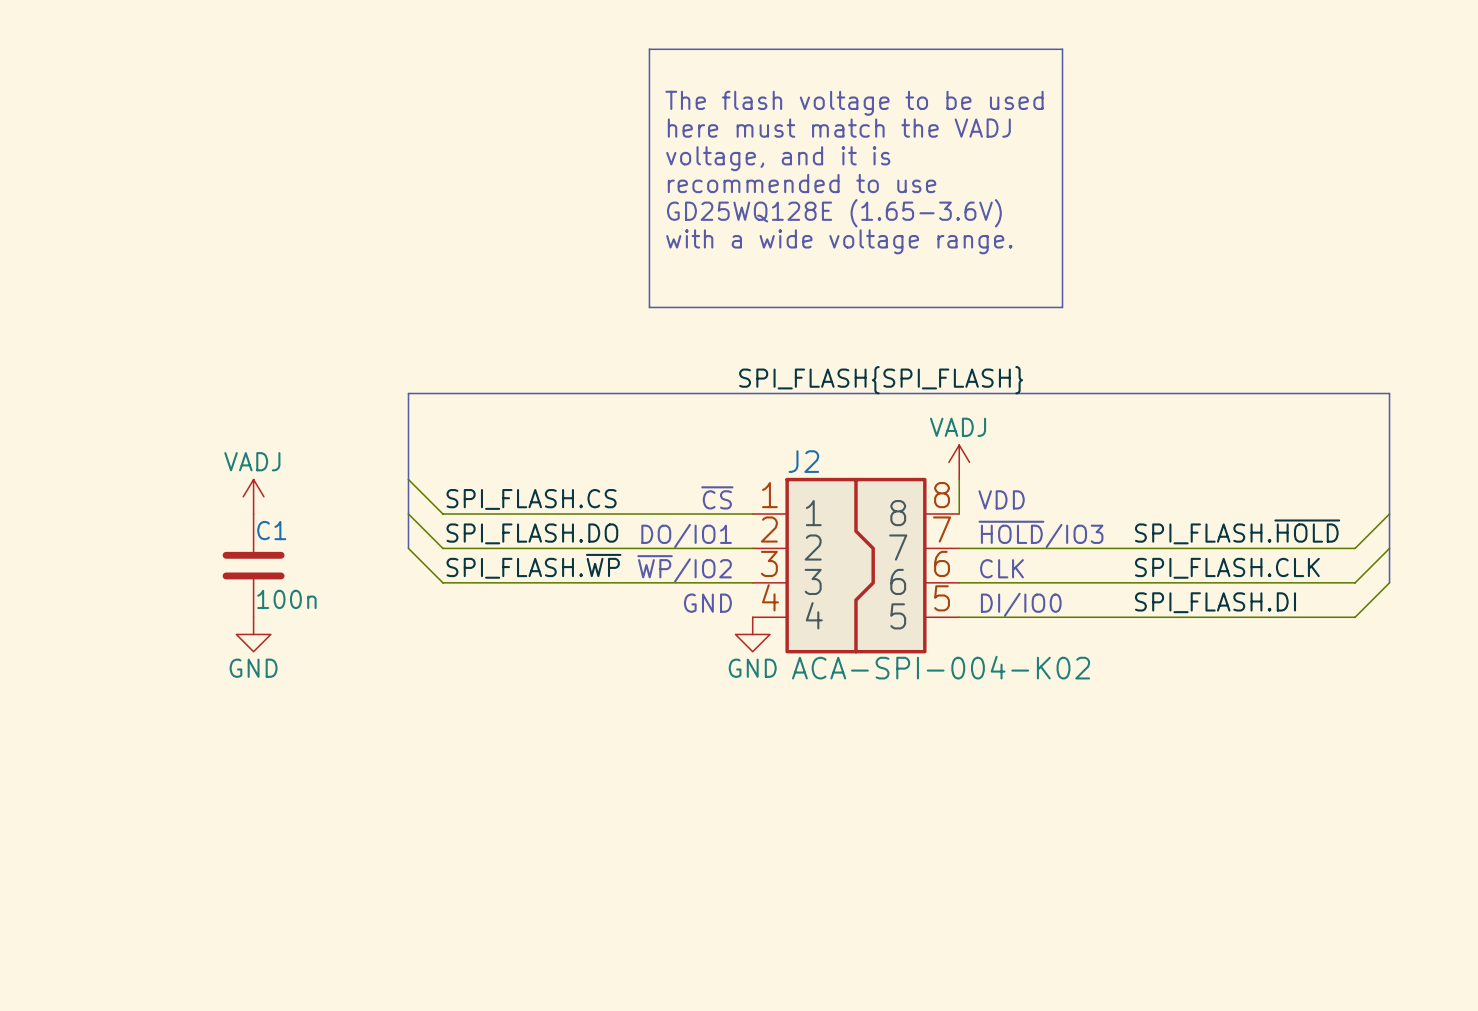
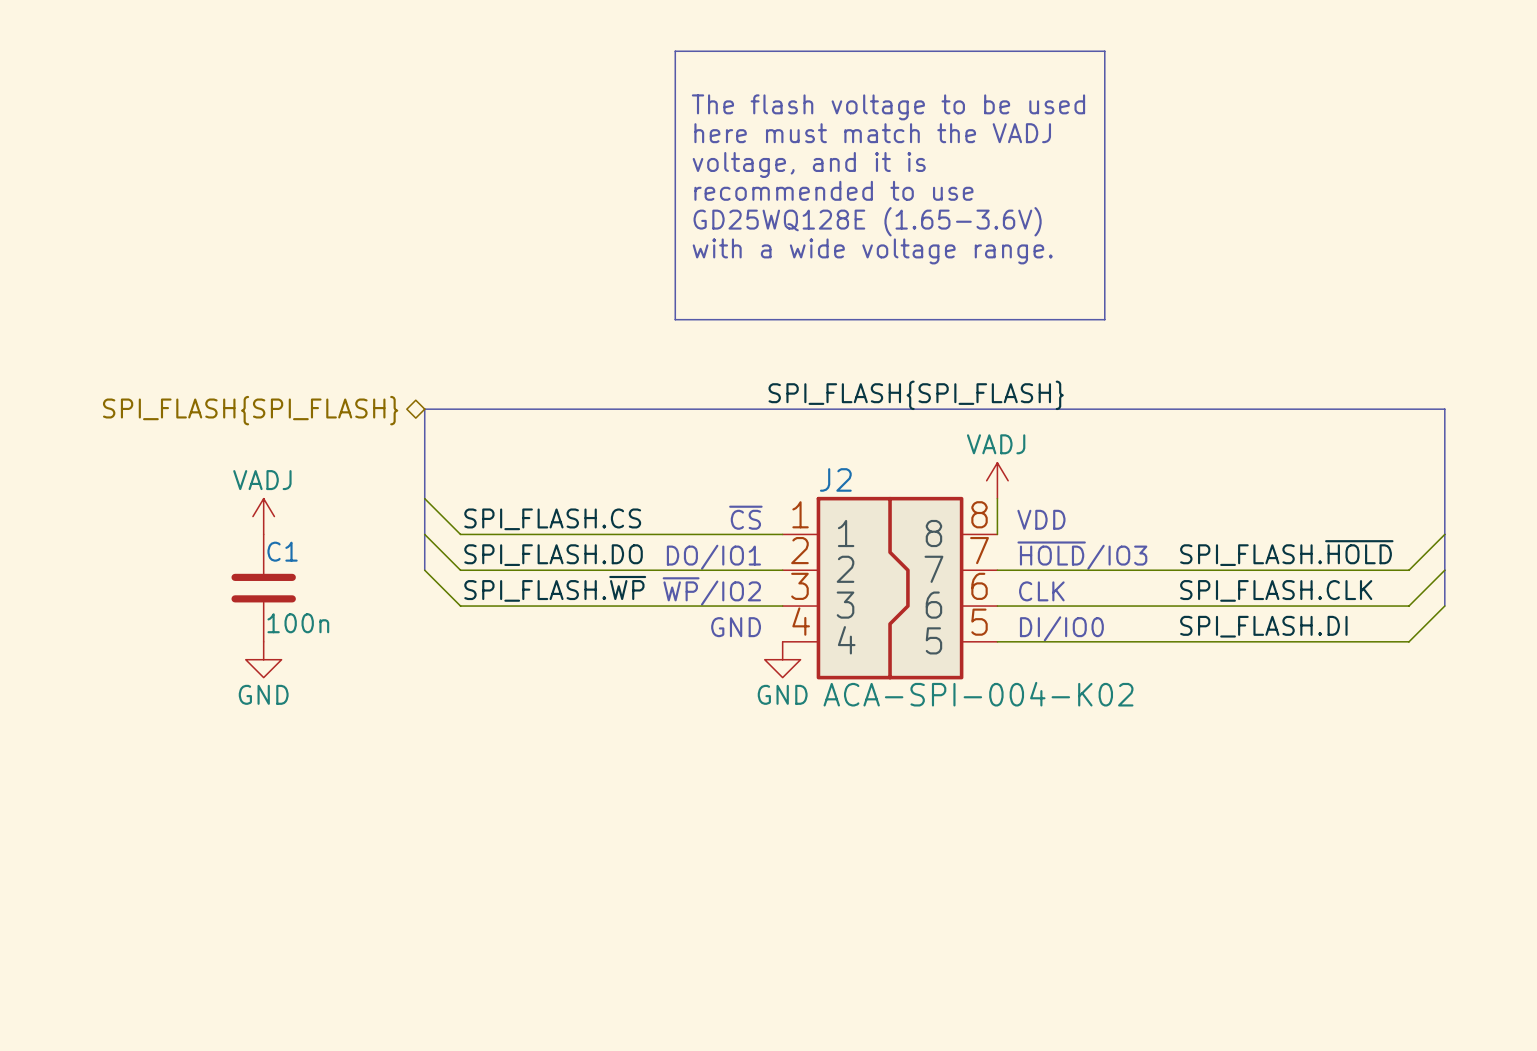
hierarchical label: none -> SPI_FLASH{SPI_FLASH} (250, 410)

